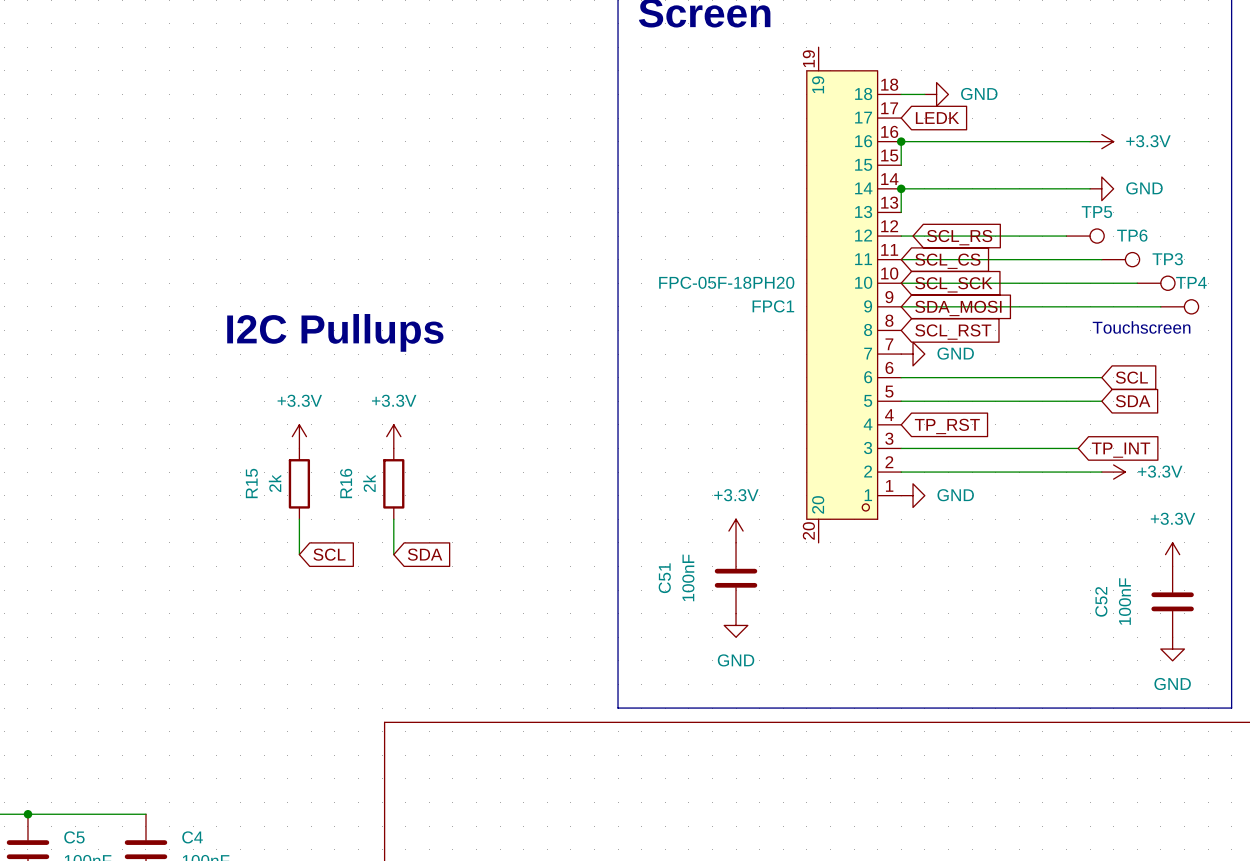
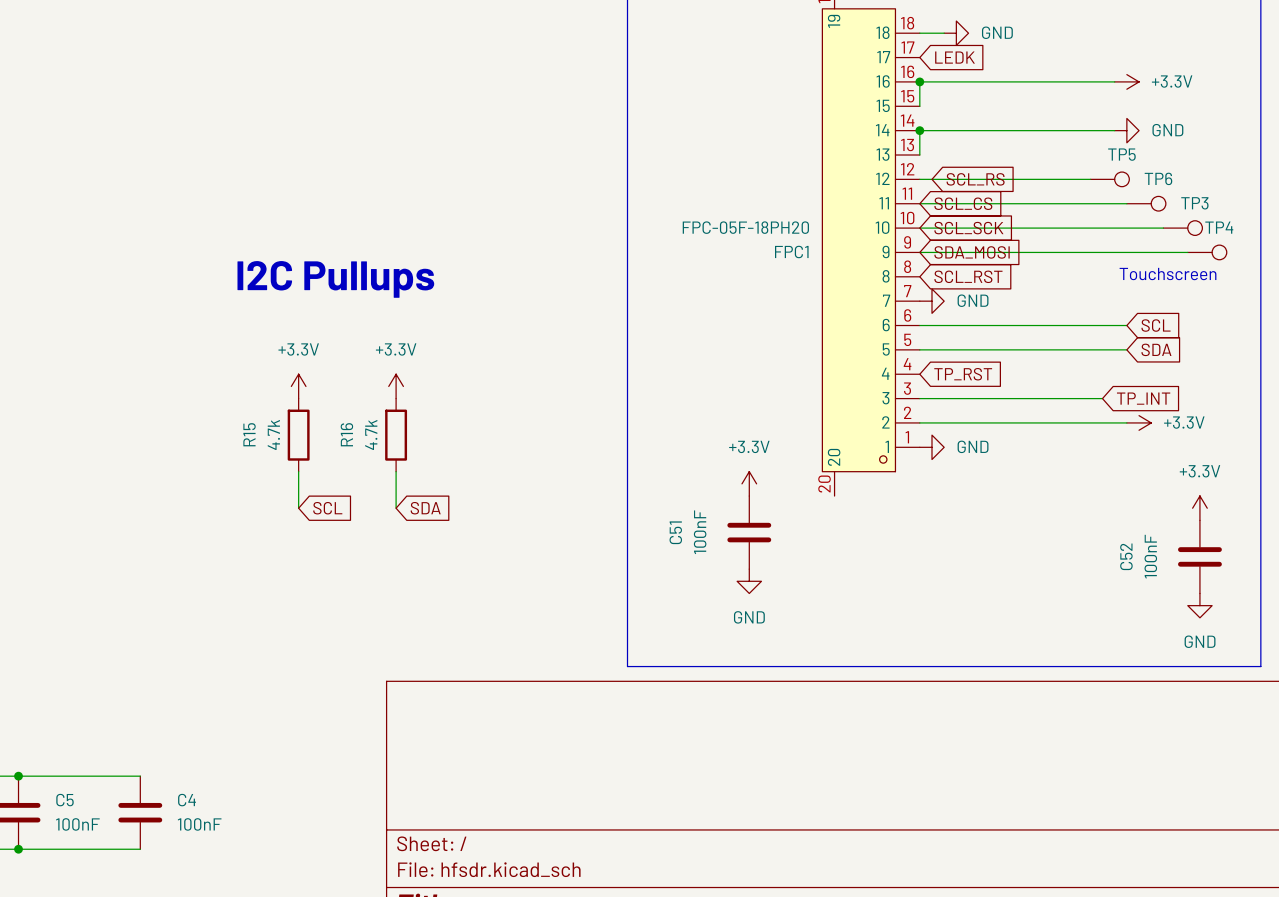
R15 value: 2k (275, 483) -> 4.7k (273, 434)
R16 value: 2k (369, 483) -> 4.7k (371, 434)

